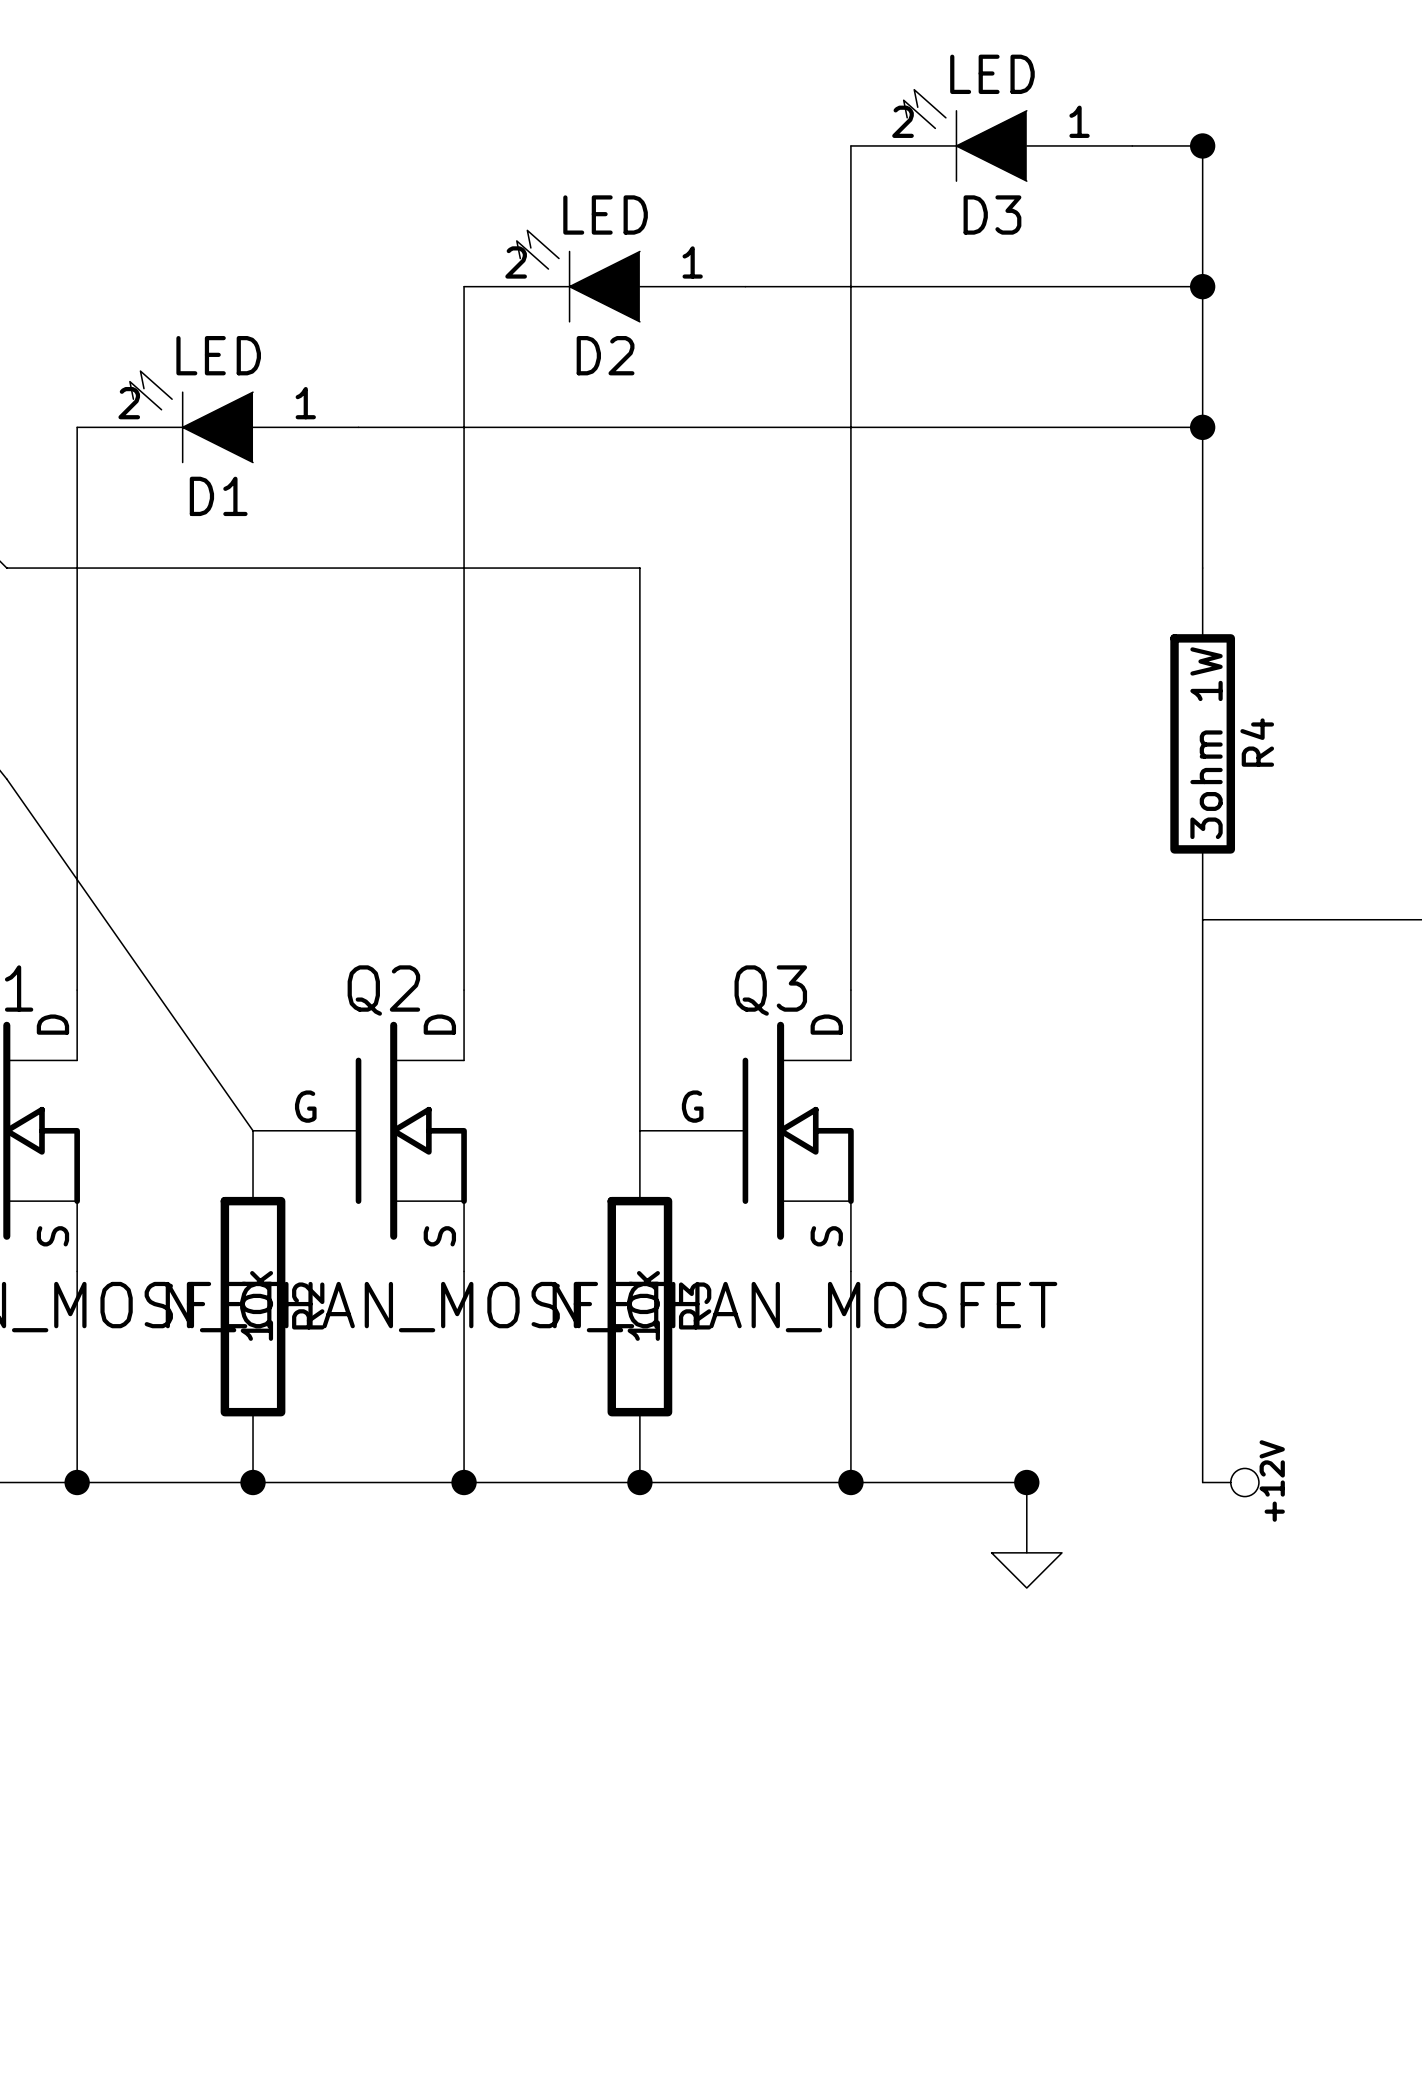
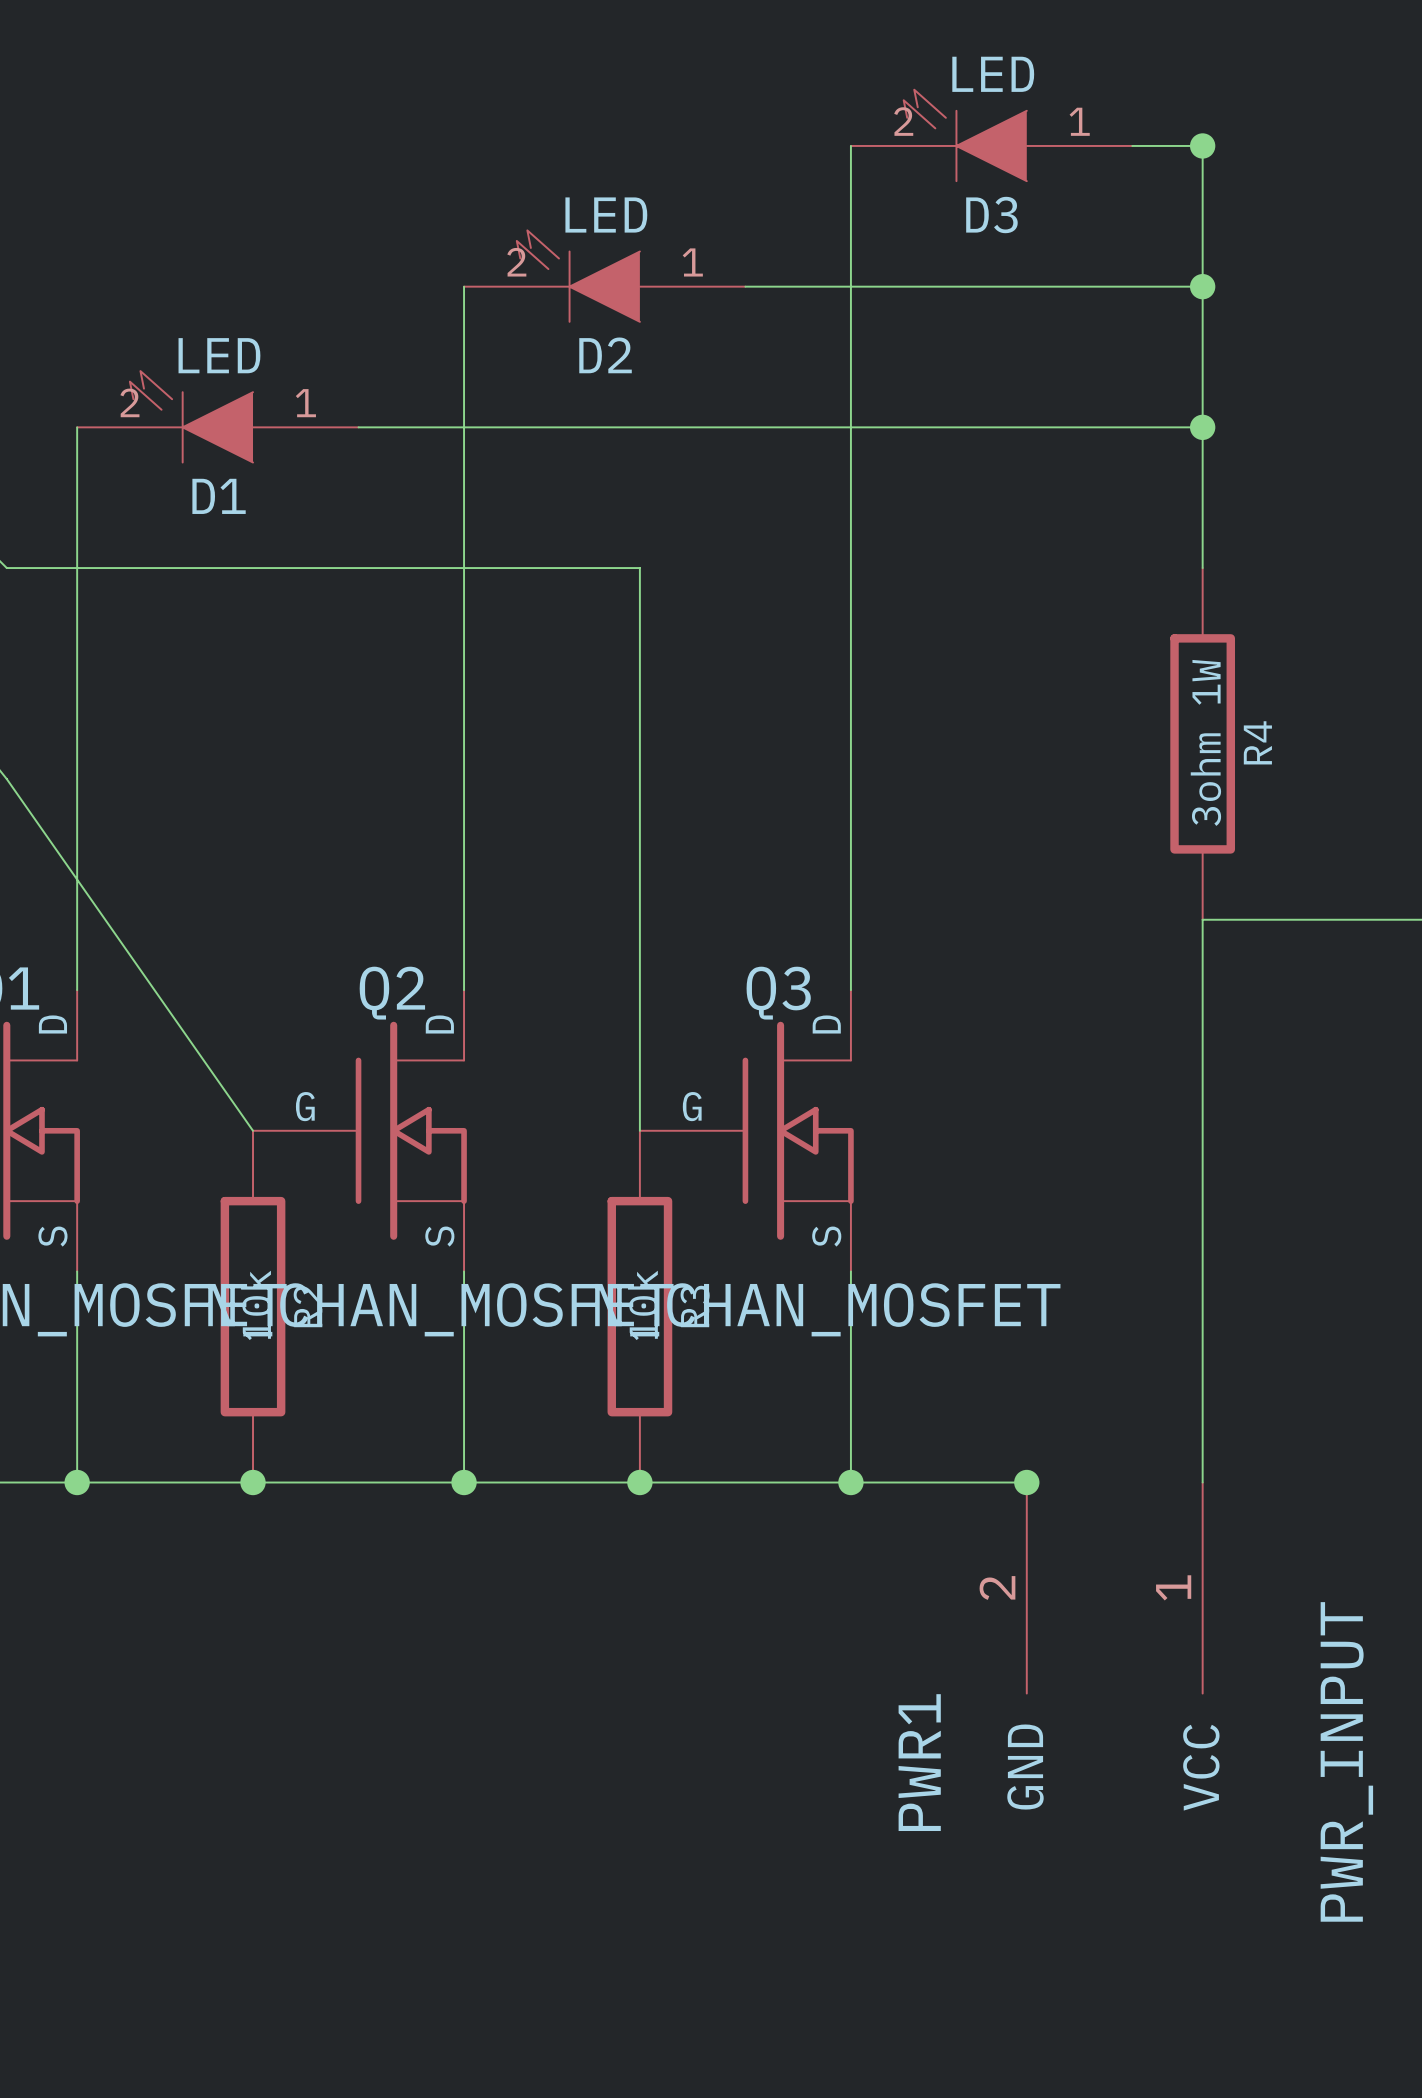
power symbol: +12V (1230, 1482) -> none
power symbol: (1026, 1570) -> none
PWR1: none -> PWR_INPUT (1114, 1588)

